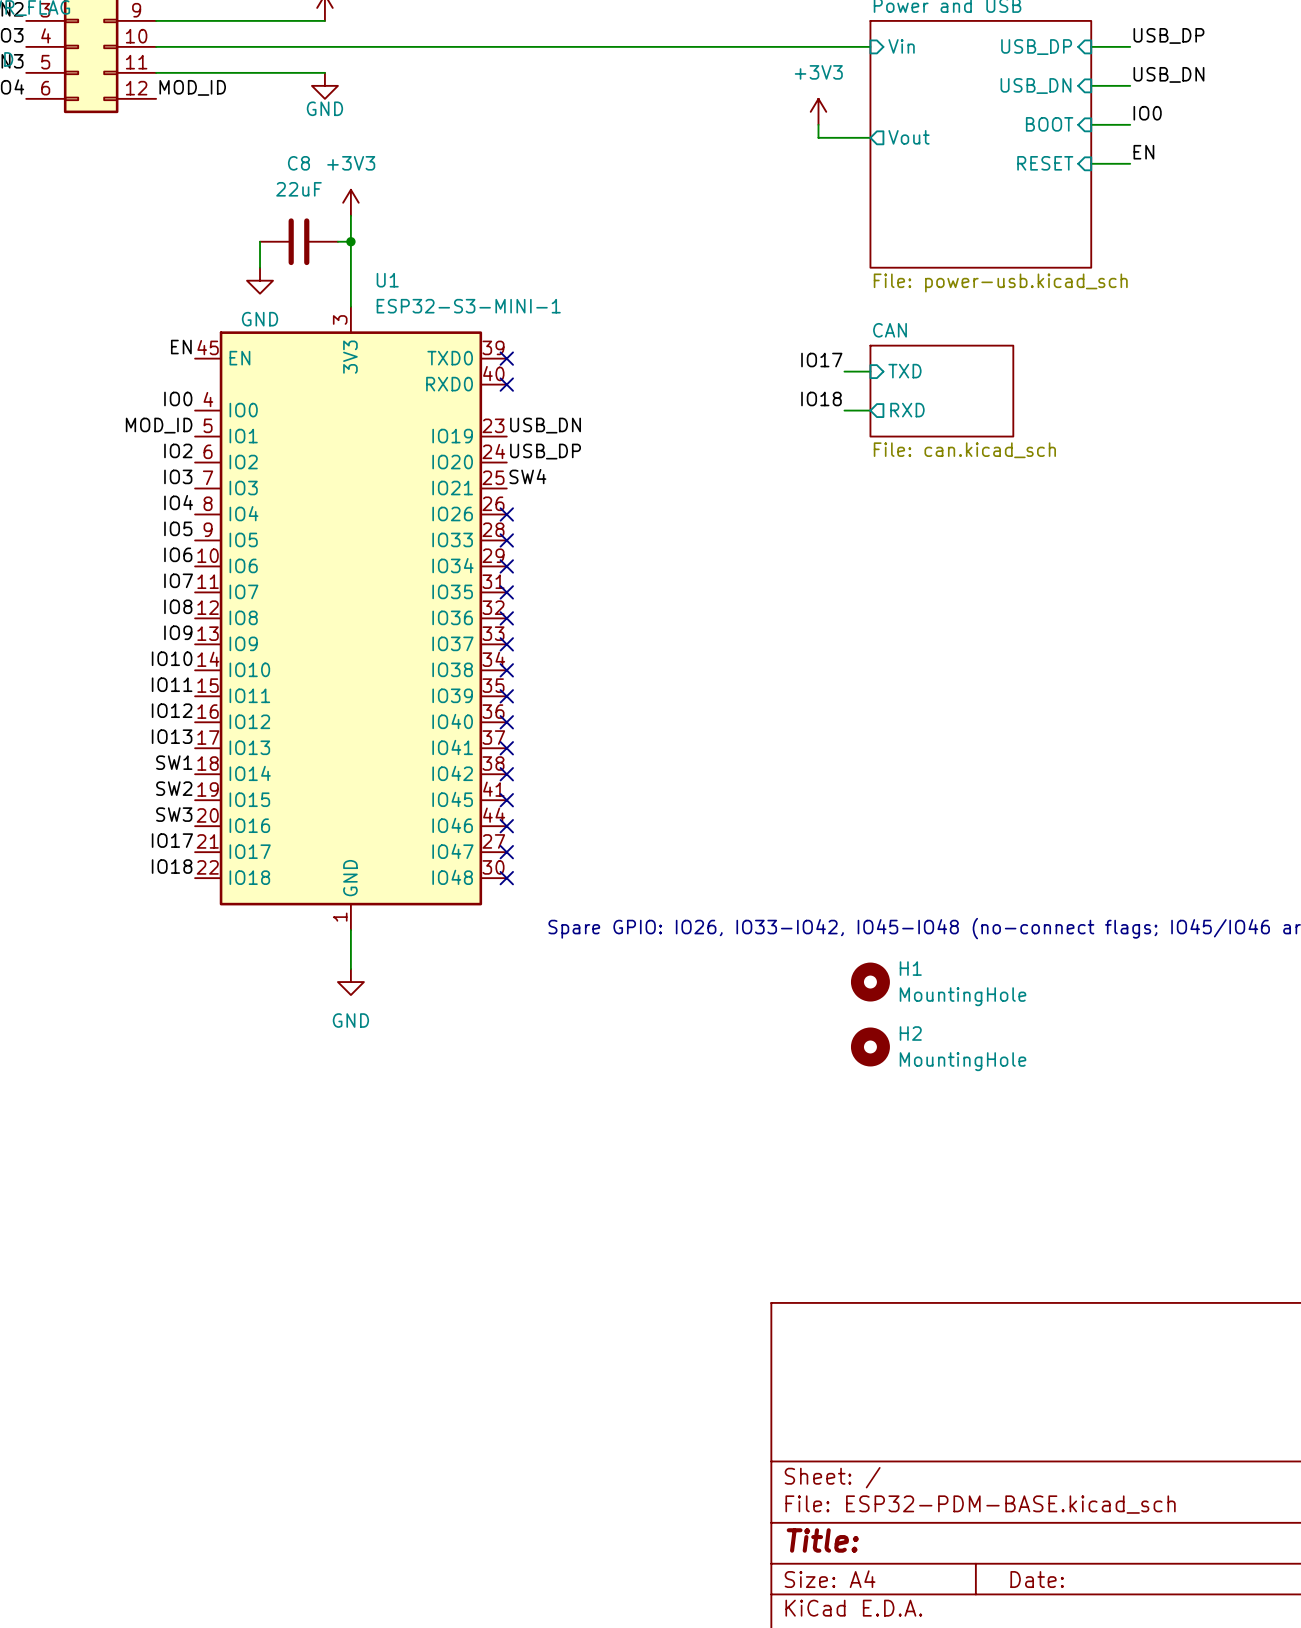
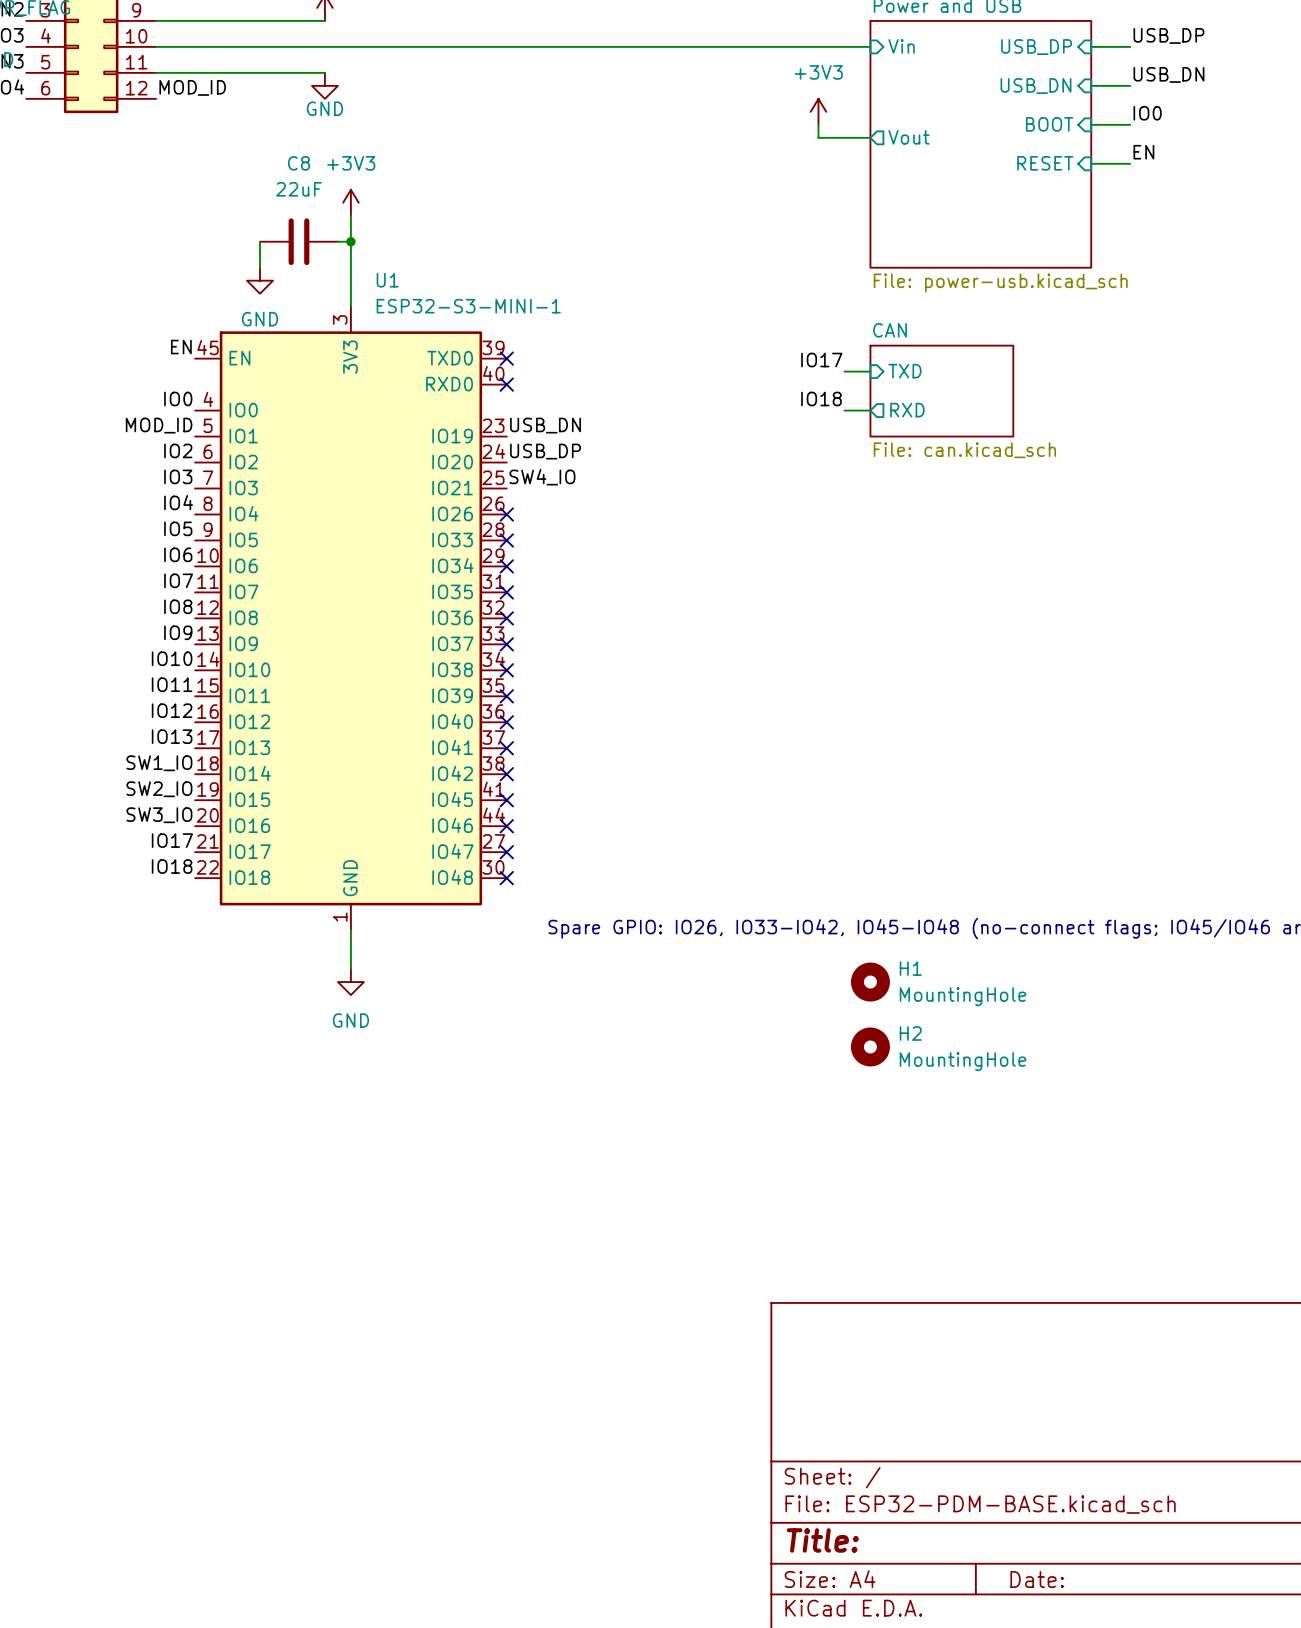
label: SW4 (527, 476) -> SW4_IO (542, 477)
label: SW1 (174, 762) -> SW1_IO (159, 763)
label: SW2 (174, 788) -> SW2_IO (159, 789)
label: SW3 (174, 814) -> SW3_IO (159, 815)

